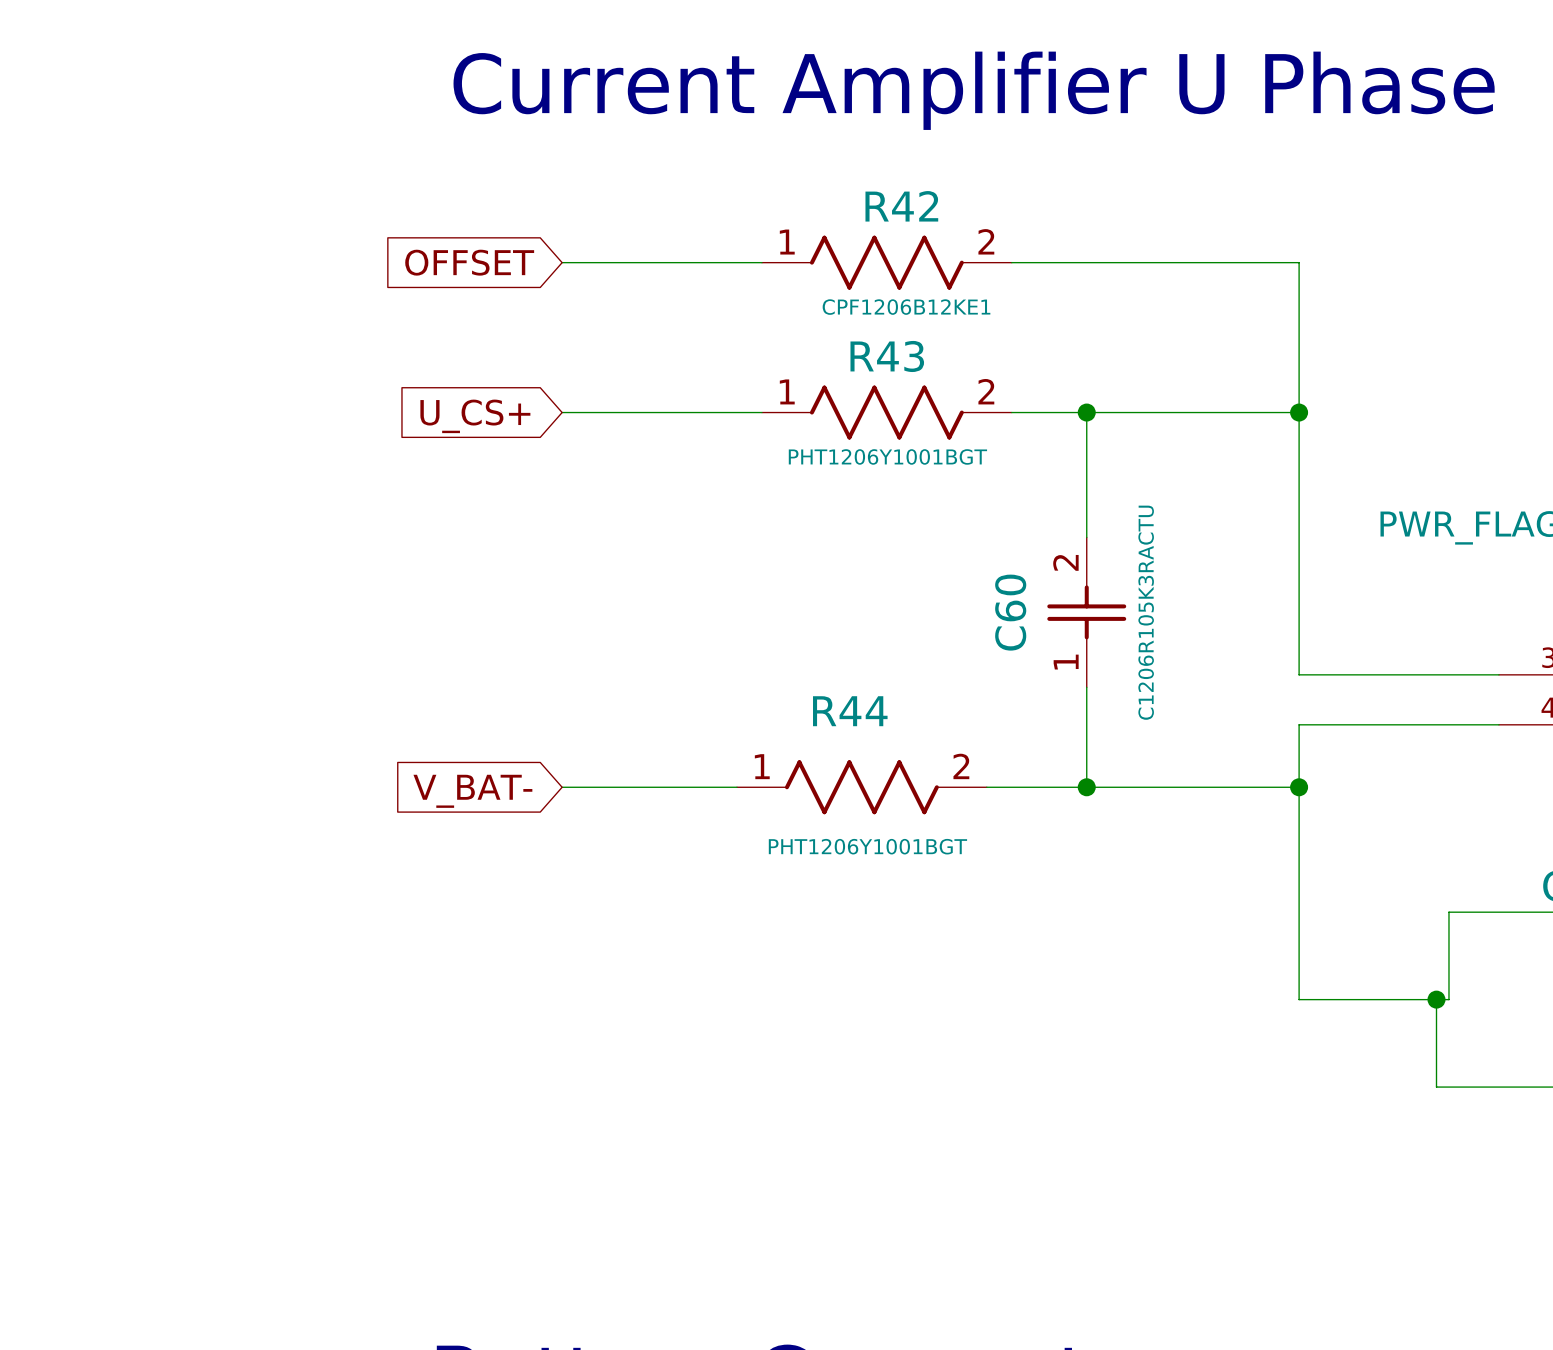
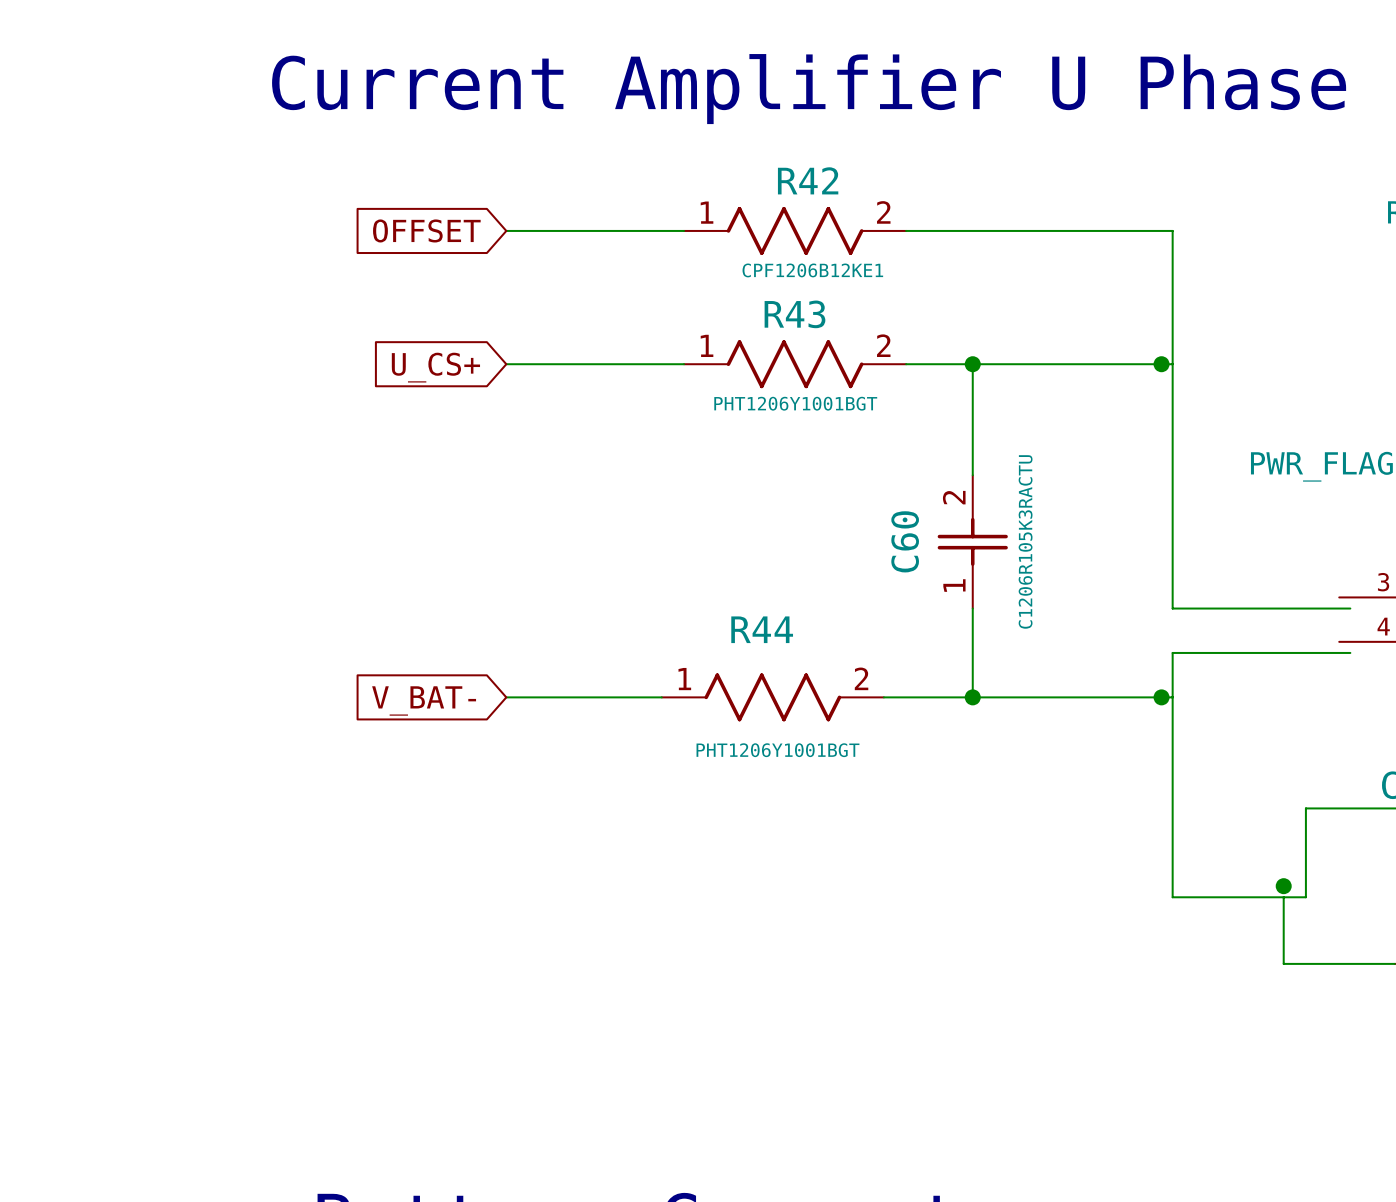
text position: Current Amplifier U Phase (974, 90) -> Current Amplifier U Phase (809, 89)
wire: (1299, 262) (1299, 674) (1498, 674) -> (1161, 230) (1172, 230) (1172, 608) (1350, 608)
wire: (1498, 724) (1299, 724) (1299, 999) (1448, 999) (1448, 912) (1461, 912) -> (1350, 652) (1172, 652) (1172, 897) (1305, 897) (1305, 808)

